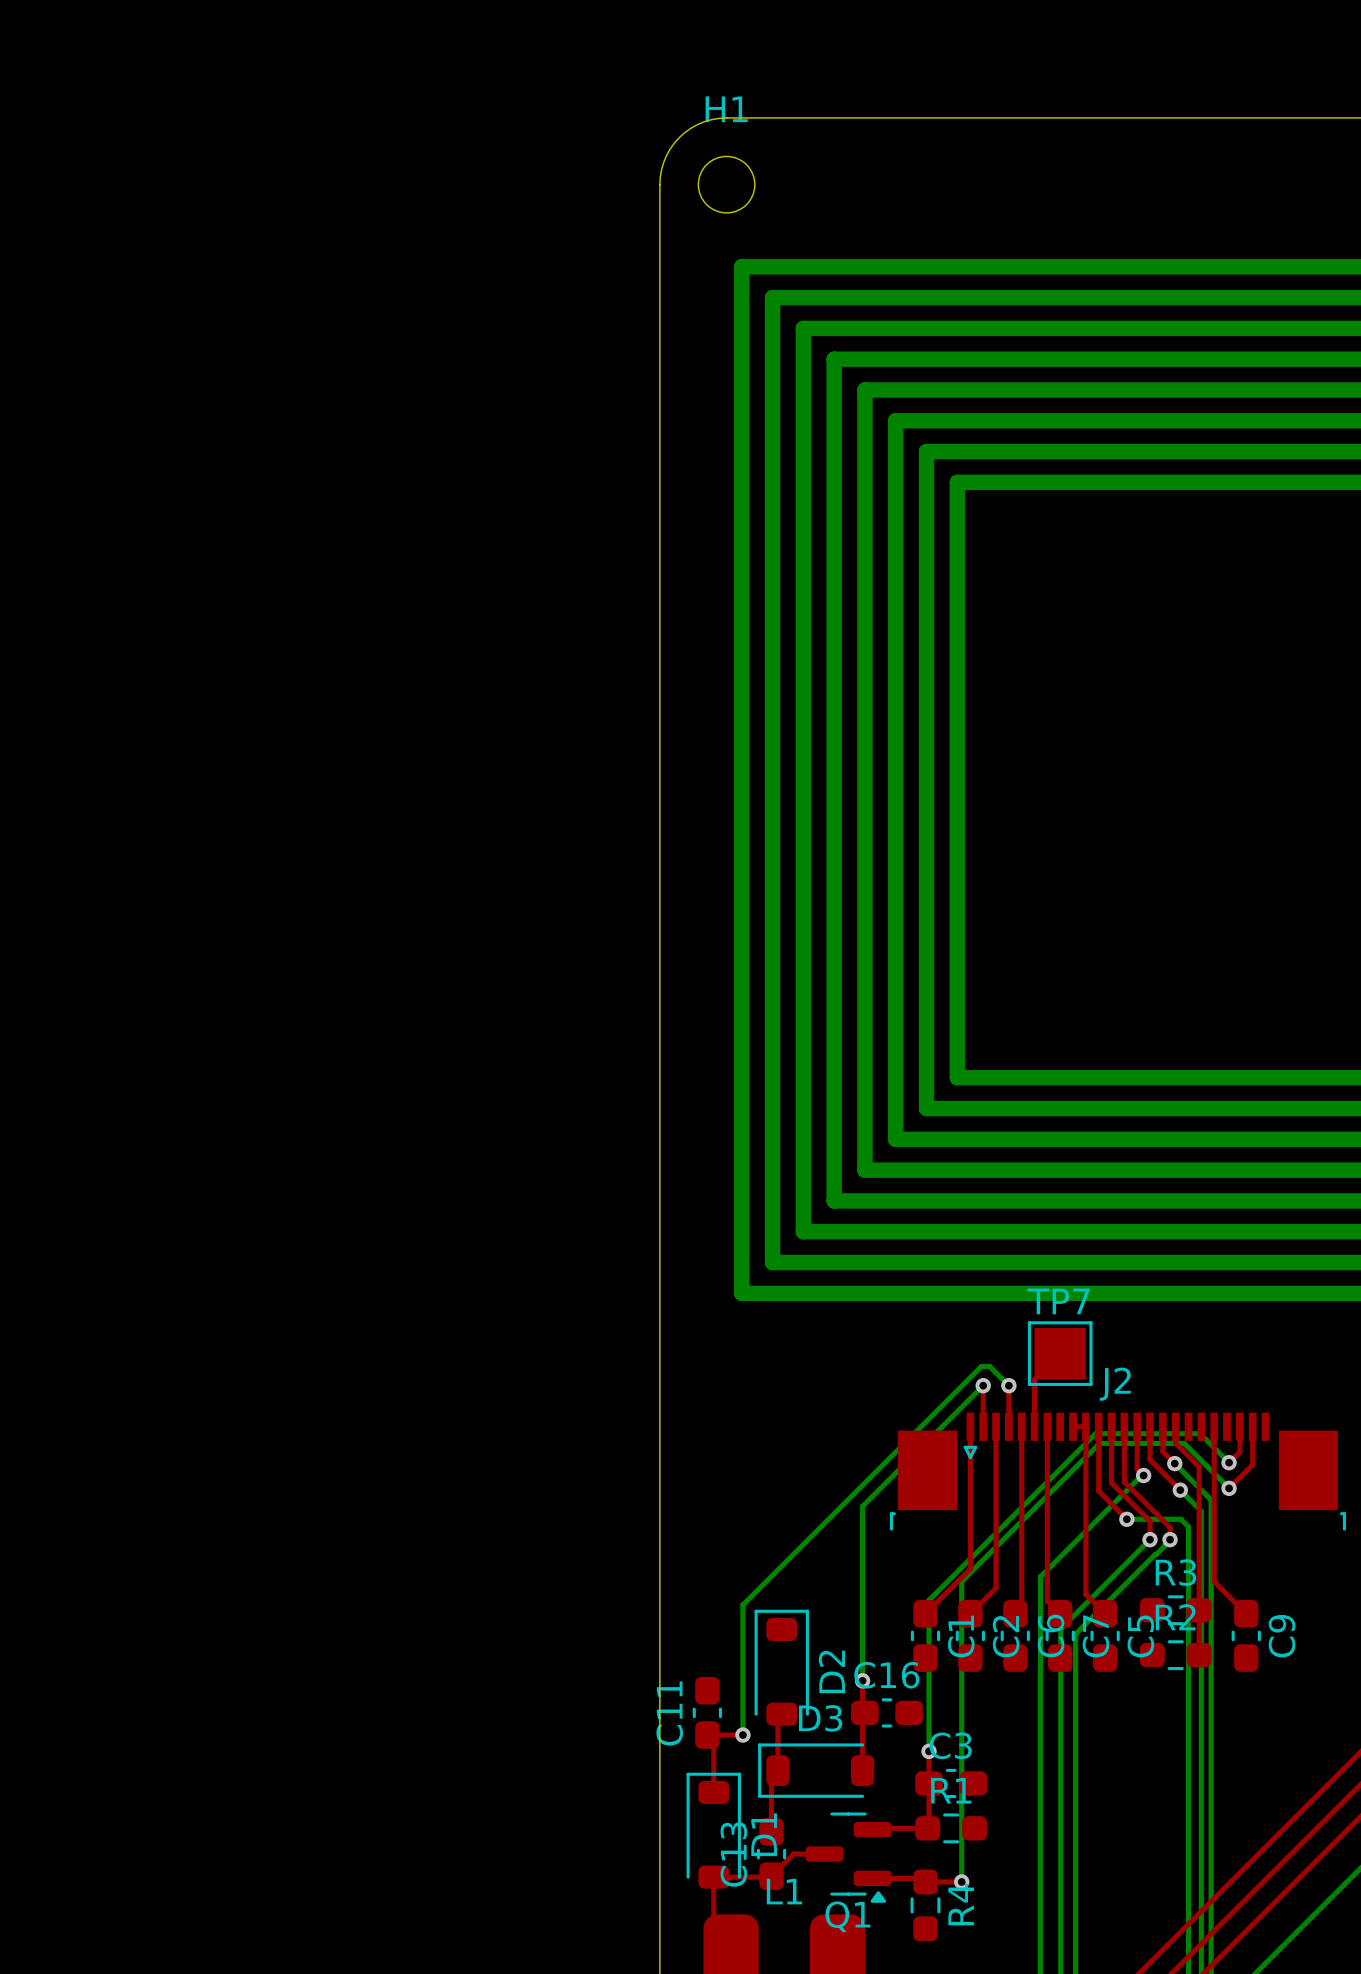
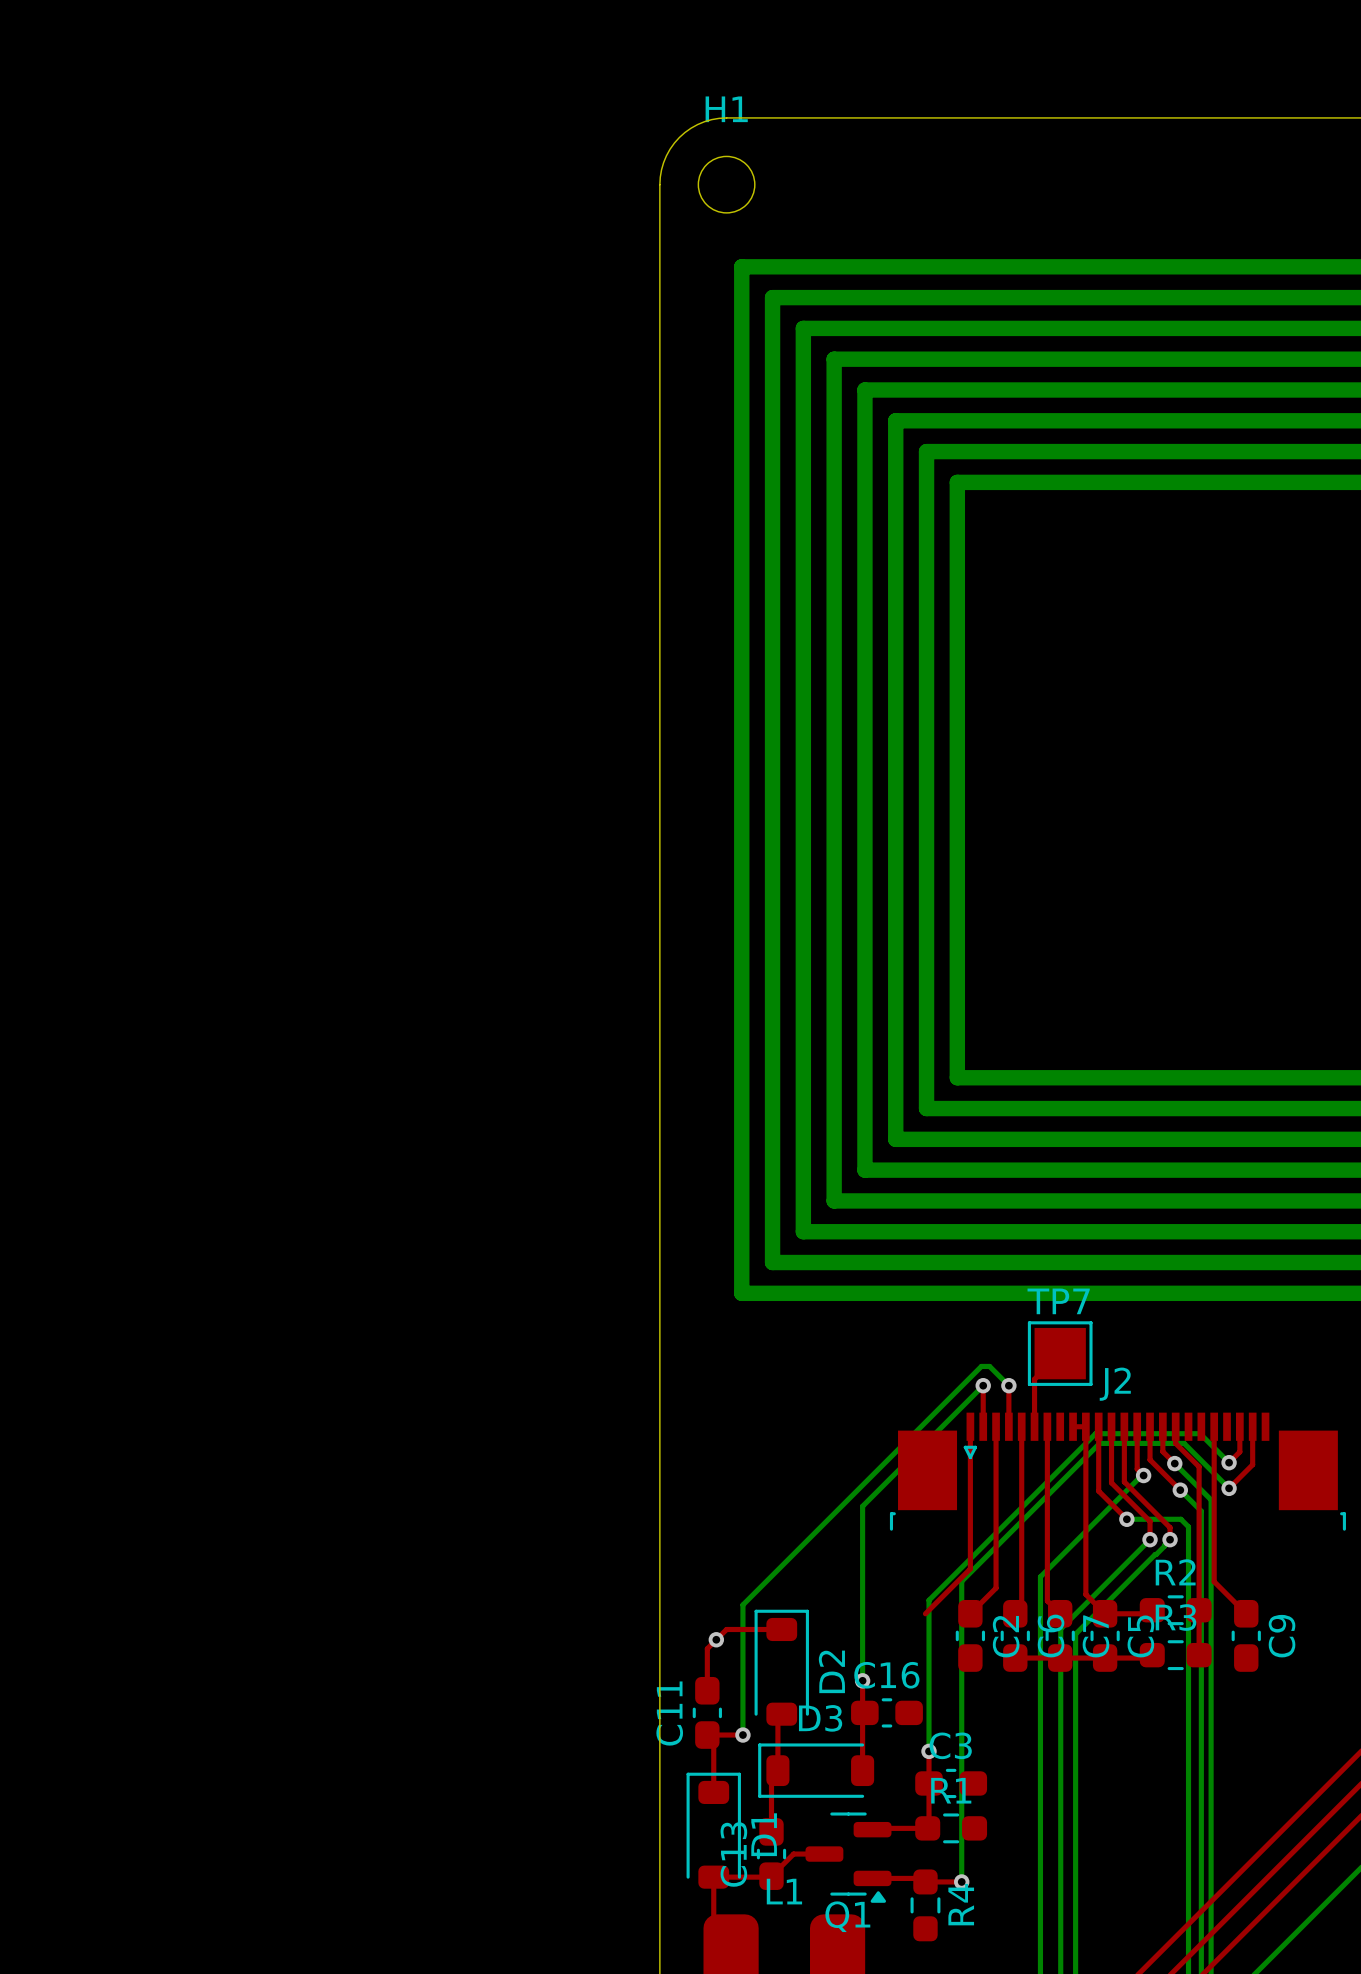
R3 name: R3 (1176, 1572) -> R2 (1175, 1572)
top track: none -> (1105, 1613) (1151, 1613)
R2 name: R2 (1175, 1617) -> R3 (1176, 1617)
top track: none -> (781, 1629) (726, 1629) (707, 1648) (707, 1690)
C1: (925, 1635) -> none
via: none -> (716, 1639)
top track: none -> (1152, 1655) (1149, 1658) (1015, 1658)

